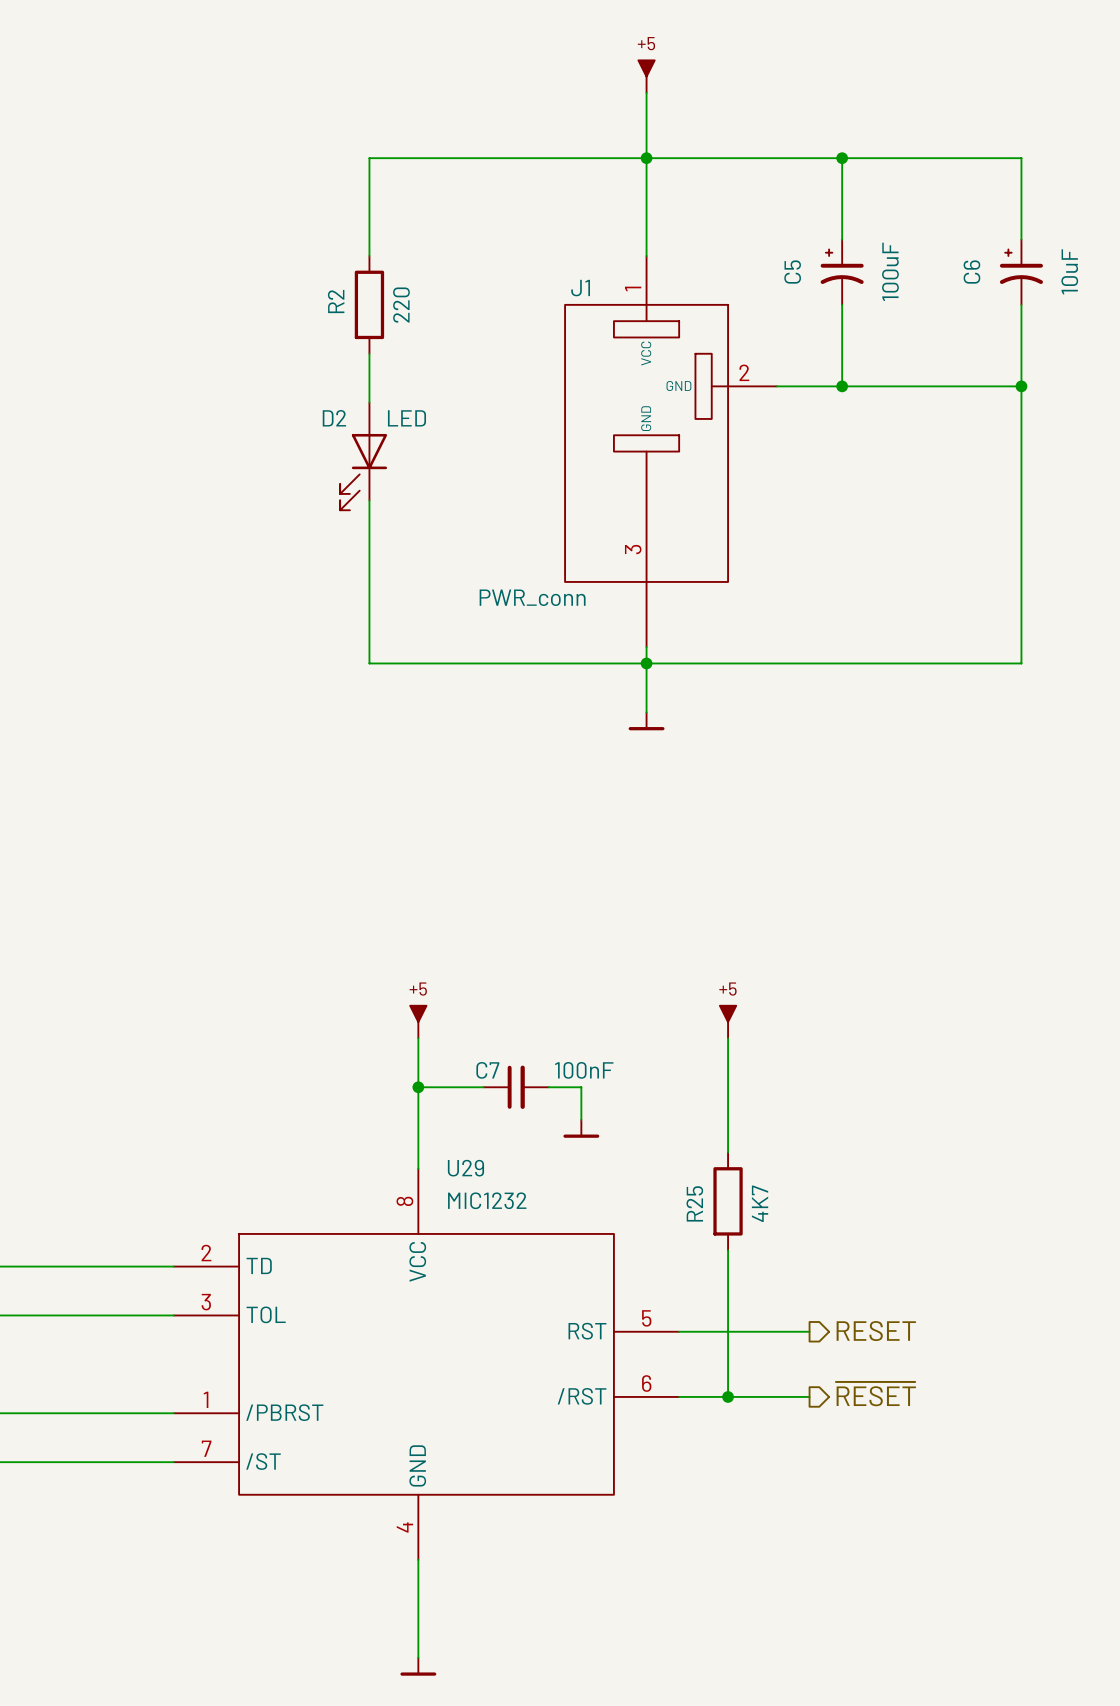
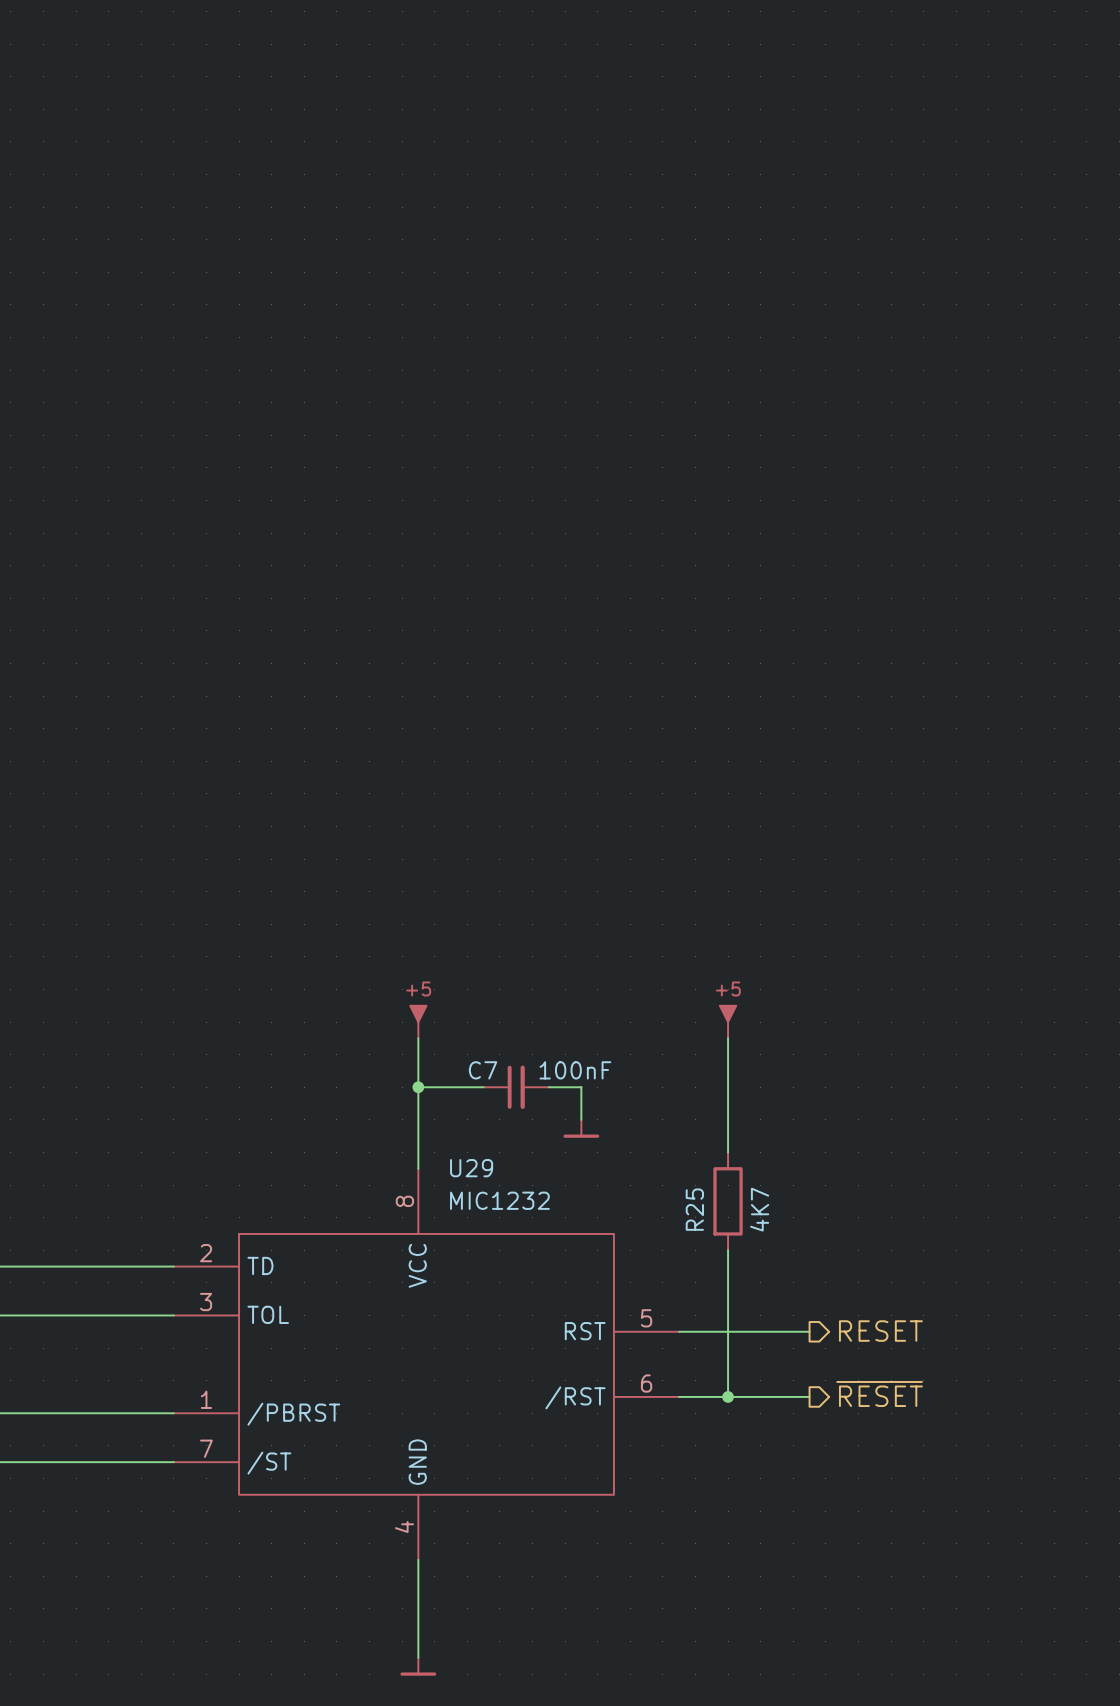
power symbol: (646, 76) -> none
wire: (646, 92) (646, 255) -> none
junction: (646, 158) -> none
wire: (842, 158) (842, 239) -> none
junction: (842, 158) -> none
wire: (1021, 239) (1021, 158) (369, 158) (369, 255) -> none
C5: 100uF (842, 272) -> none
C6: 10uF (1021, 272) -> none
R2: 220 (369, 304) -> none
wire: (842, 304) (842, 386) -> none
wire: (1021, 304) (1021, 663) (369, 663) (369, 500) -> none
wire: (369, 353) (369, 402) -> none
wire: (776, 386) (1021, 386) -> none
junction: (842, 386) -> none
junction: (1021, 386) -> none
J1: PWR_conn (671, 451) -> none
D2: LED (363, 456) -> none
wire: (646, 647) (646, 712) -> none
junction: (646, 663) -> none
power symbol: (646, 721) -> none

